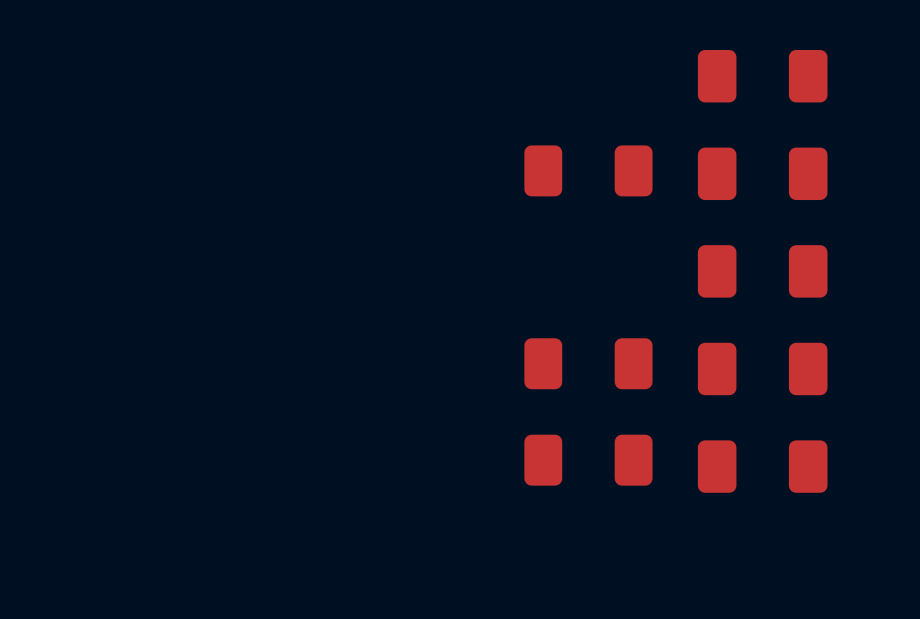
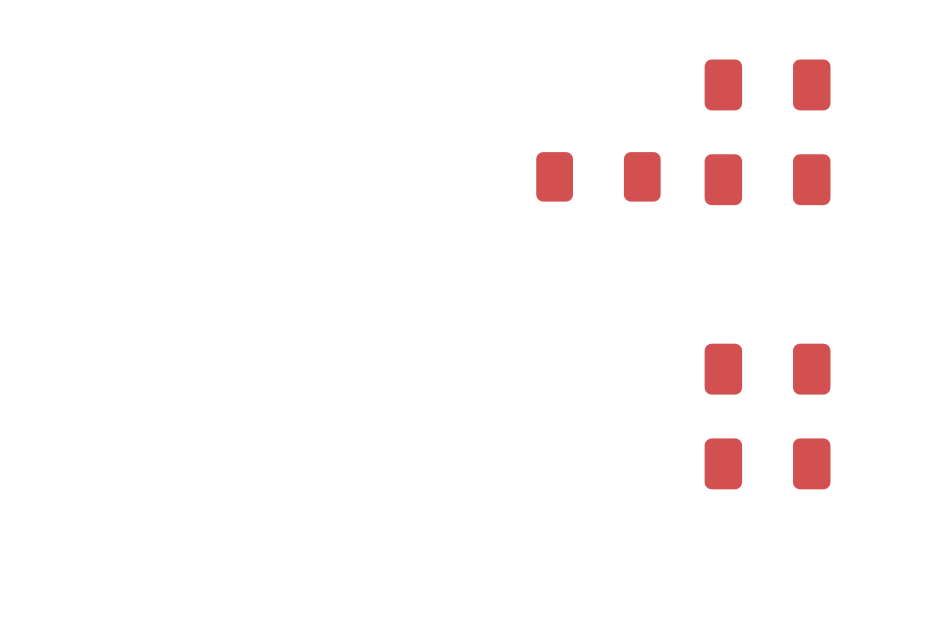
part: (762, 271) -> none
part: (588, 363) -> none
part: (588, 460) -> none

